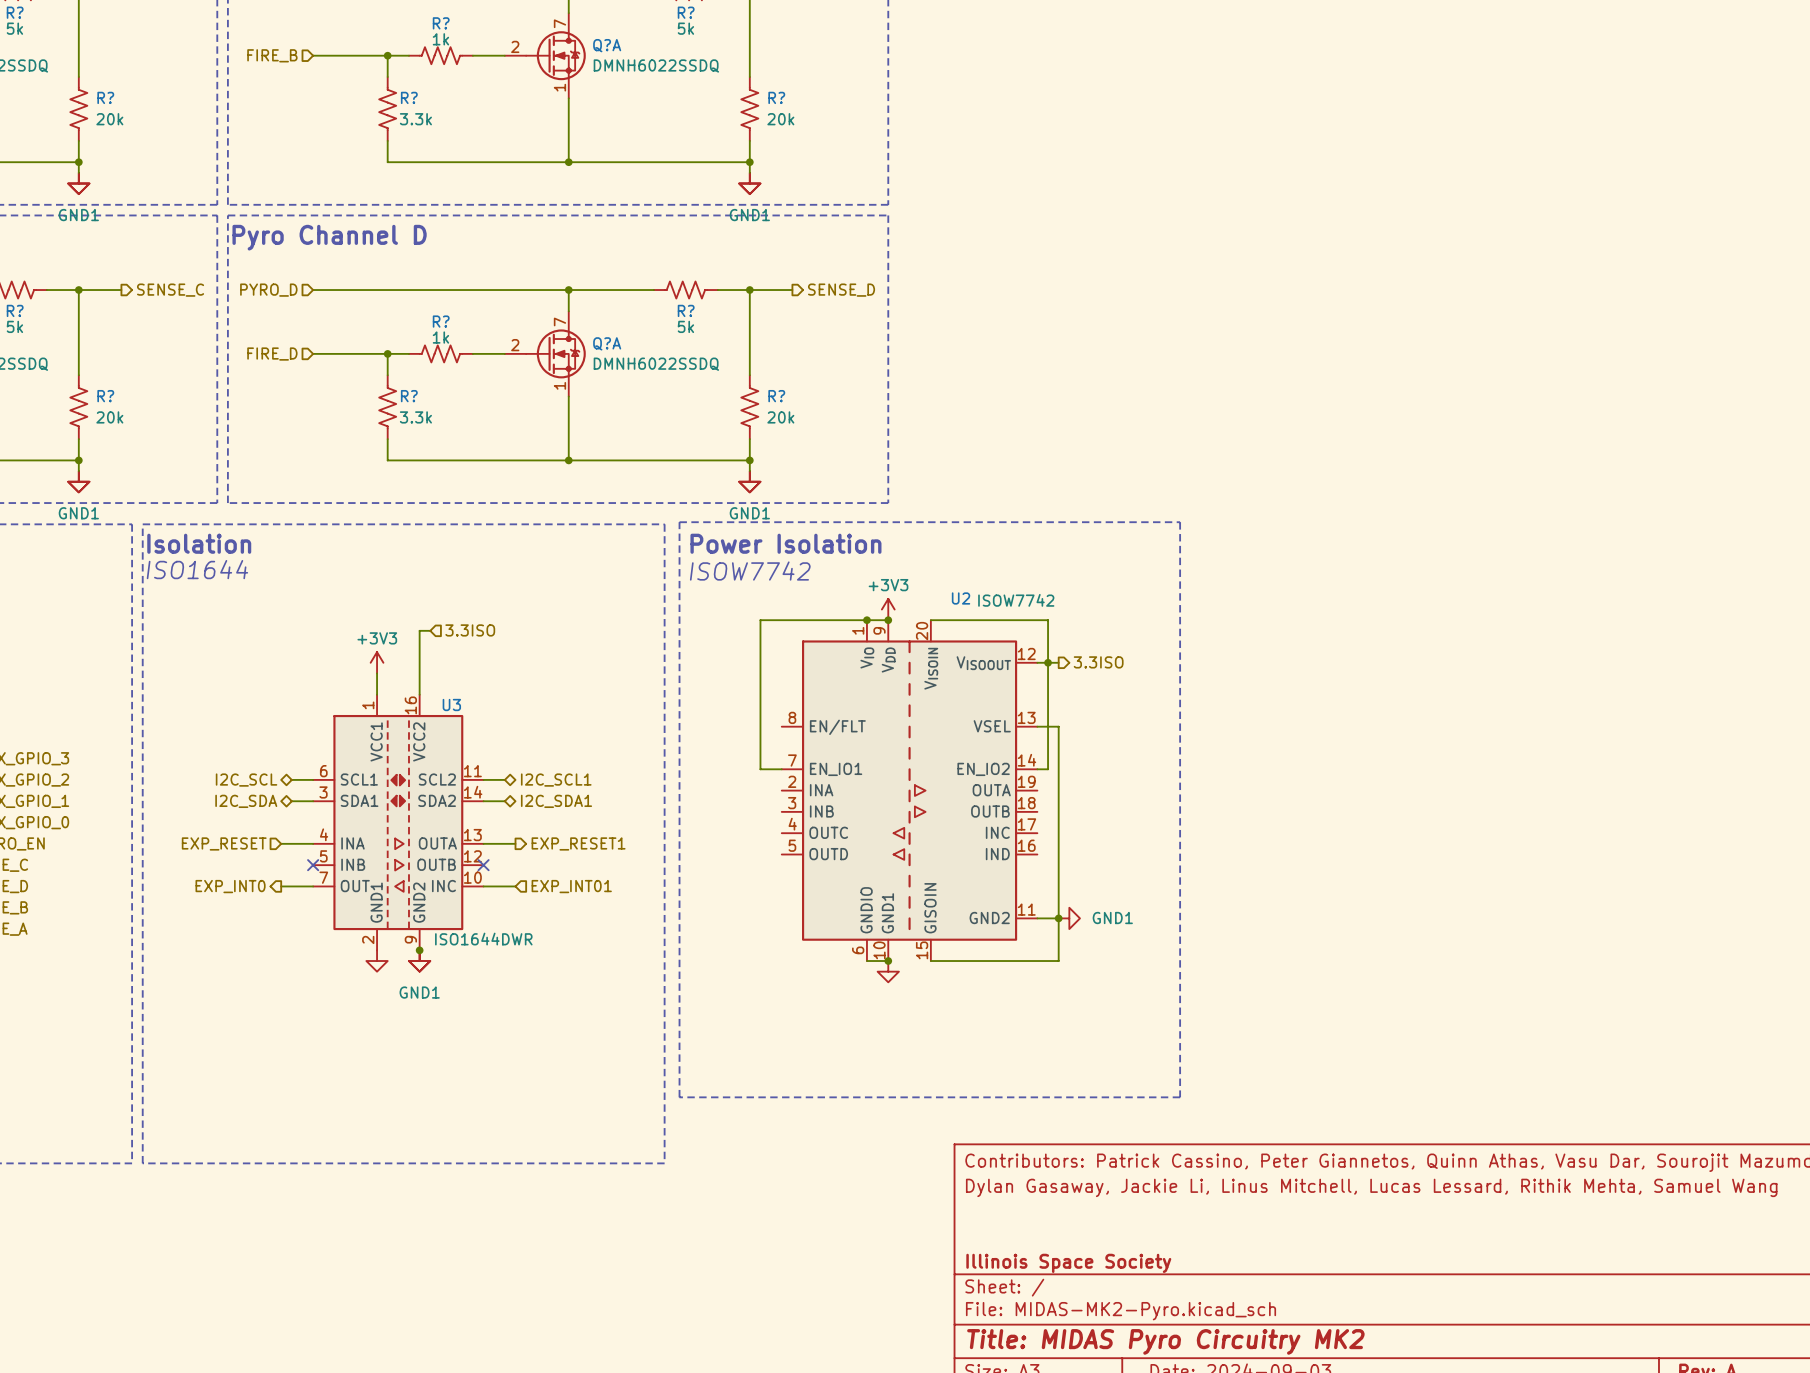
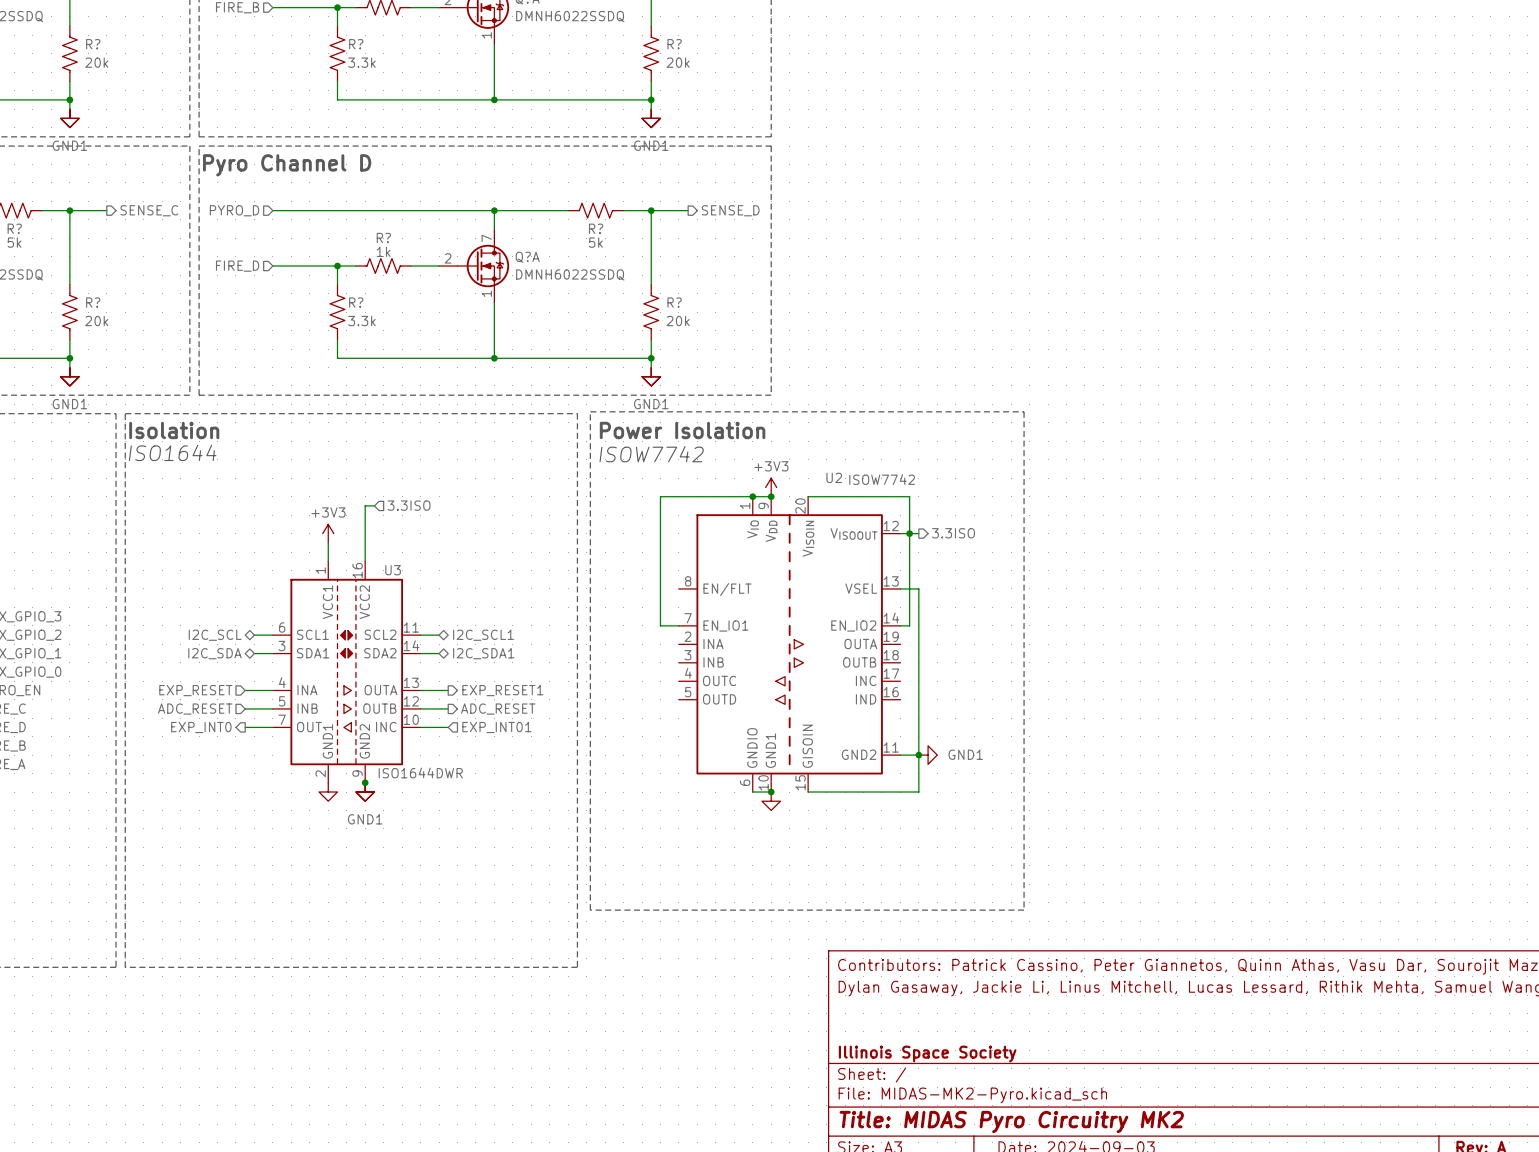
hierarchical label: none -> ADC_RESET (195, 709)
wire: none -> (245, 708) (272, 708)
no-connect mark: (313, 865) -> none
wire: none -> (420, 708) (448, 708)
no-connect mark: (483, 865) -> none
hierarchical label: none -> ADC_RESET (498, 709)

